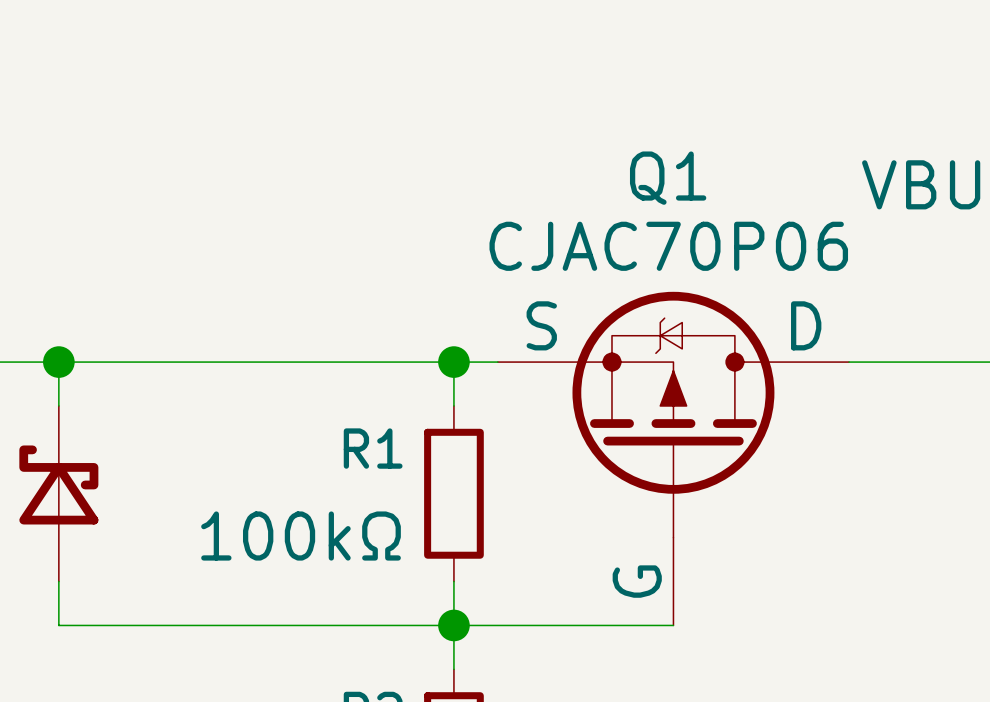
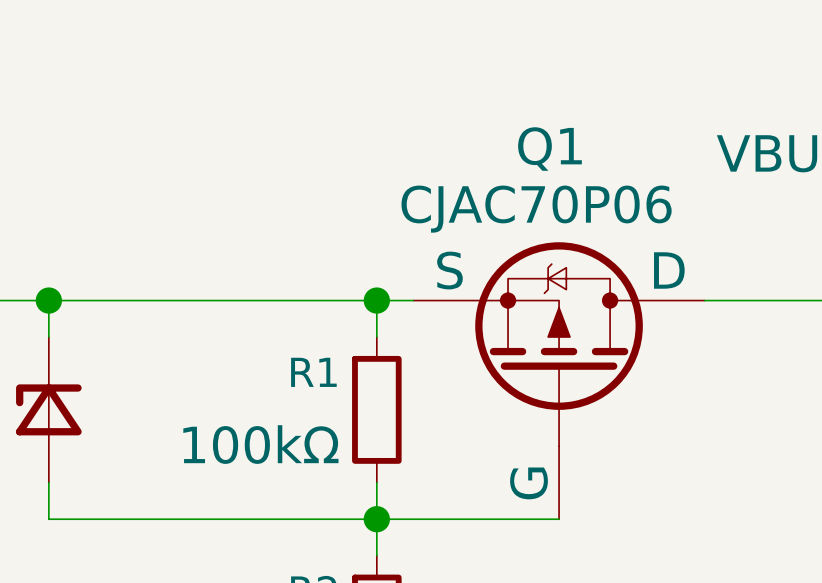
part symbol: [19, 405, 99, 582] -> [16, 337, 82, 483]

